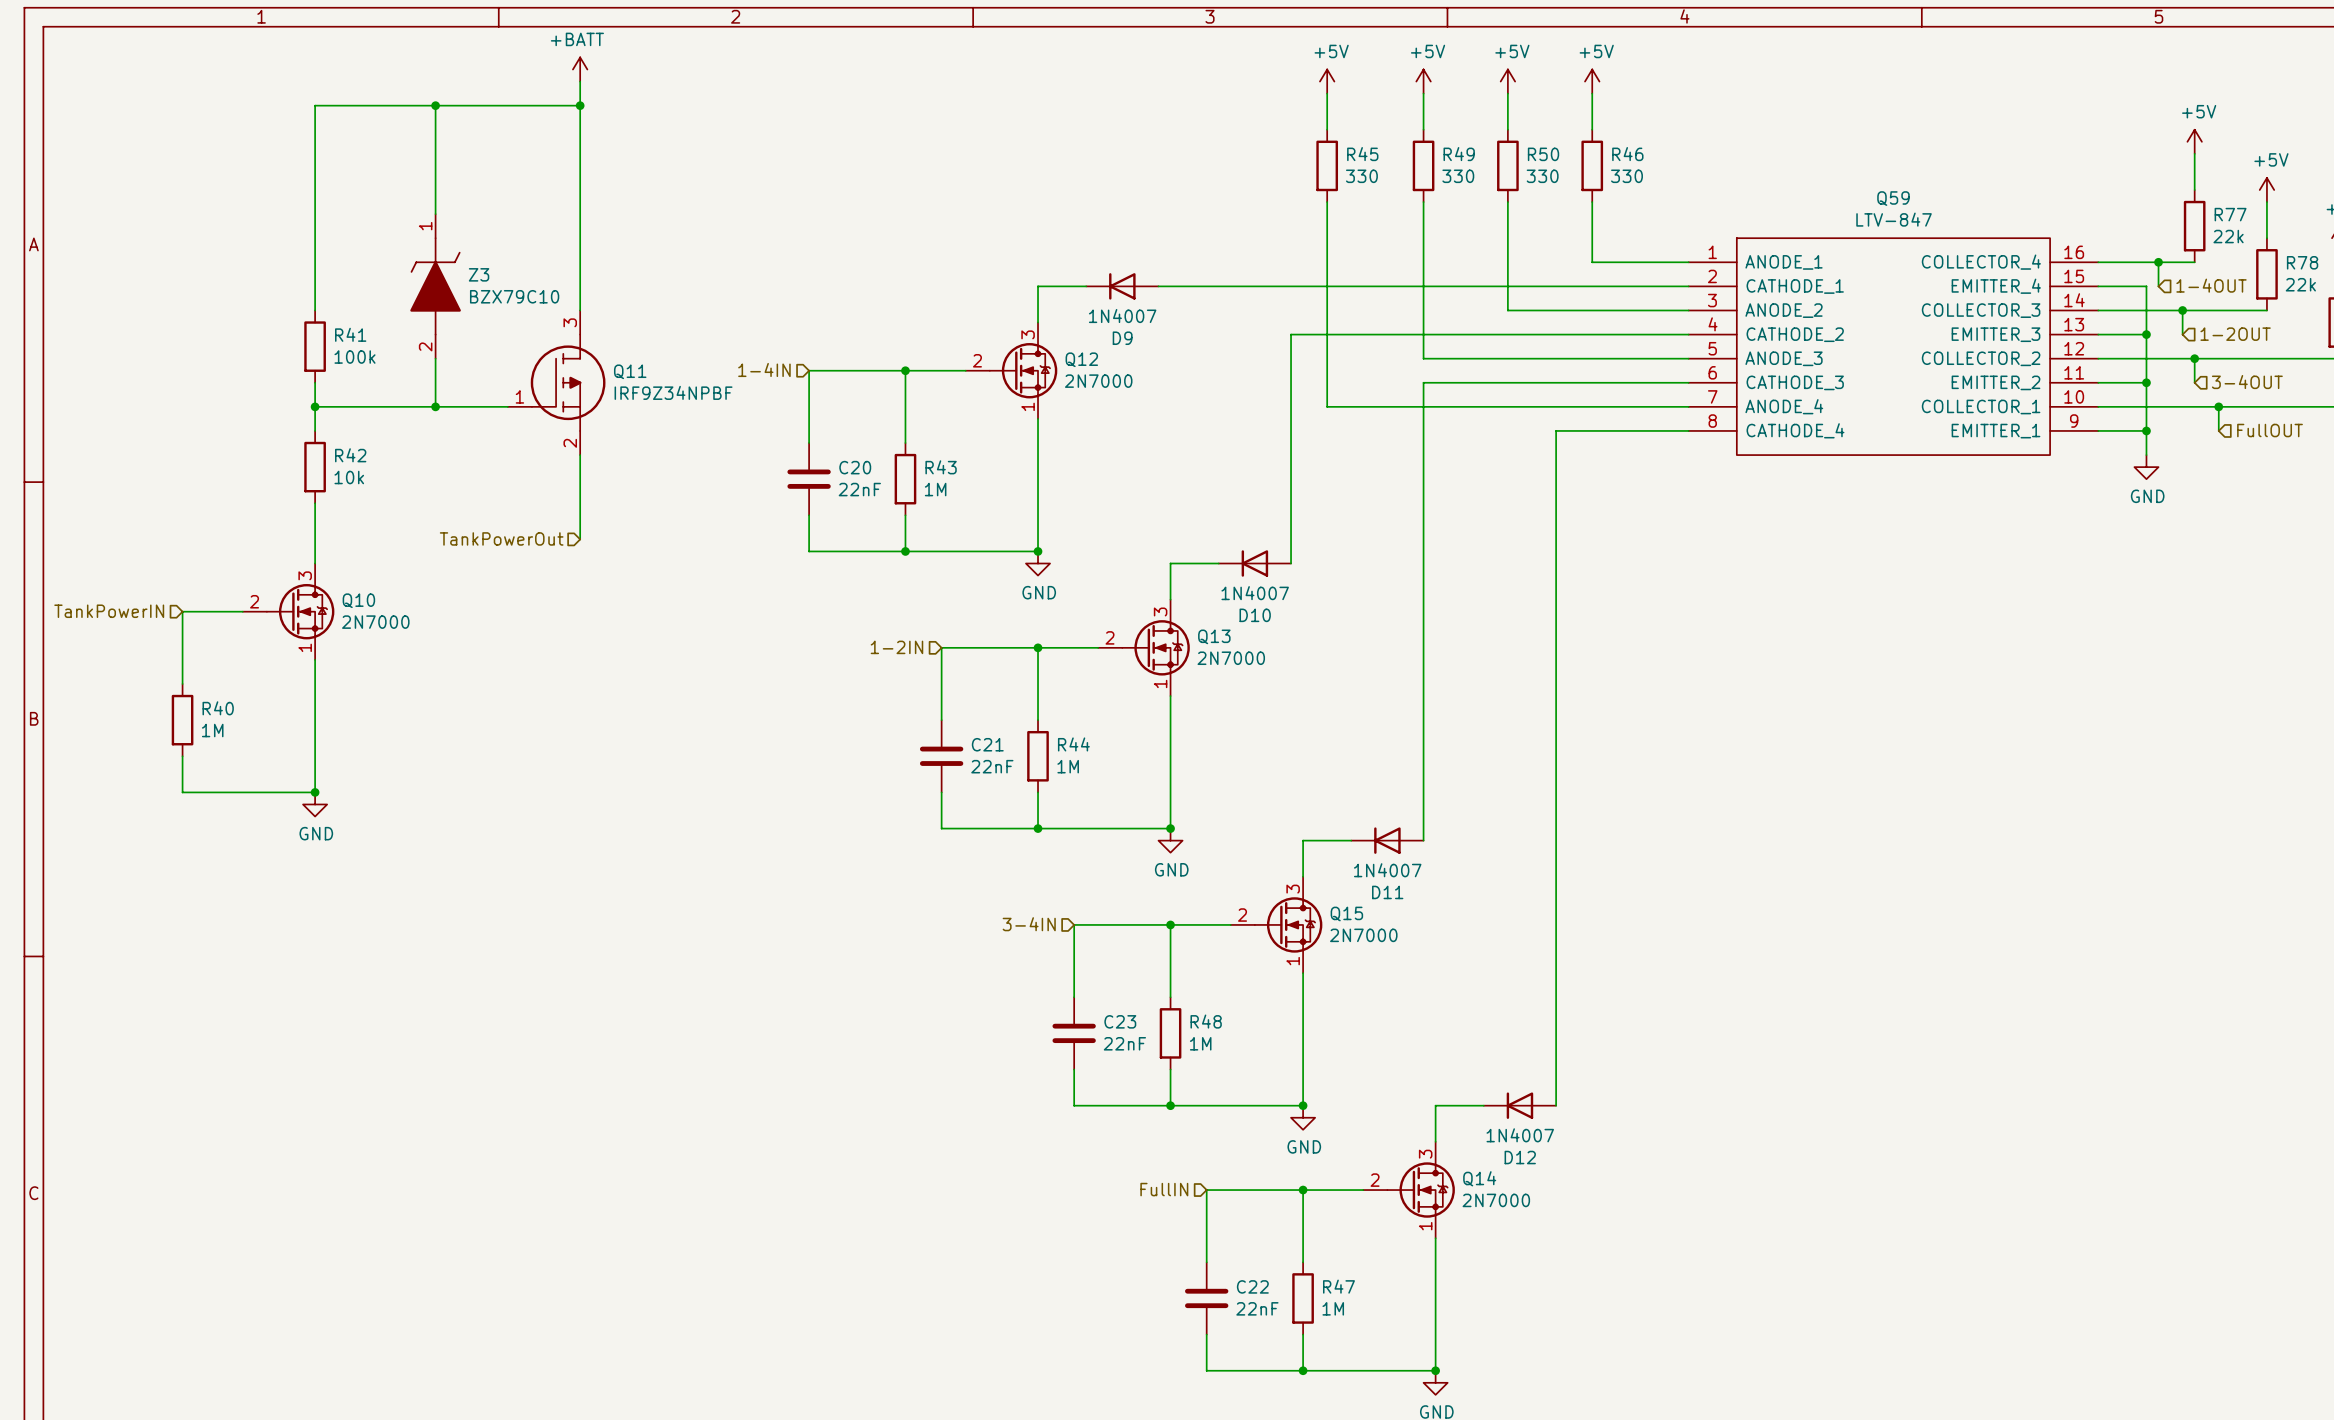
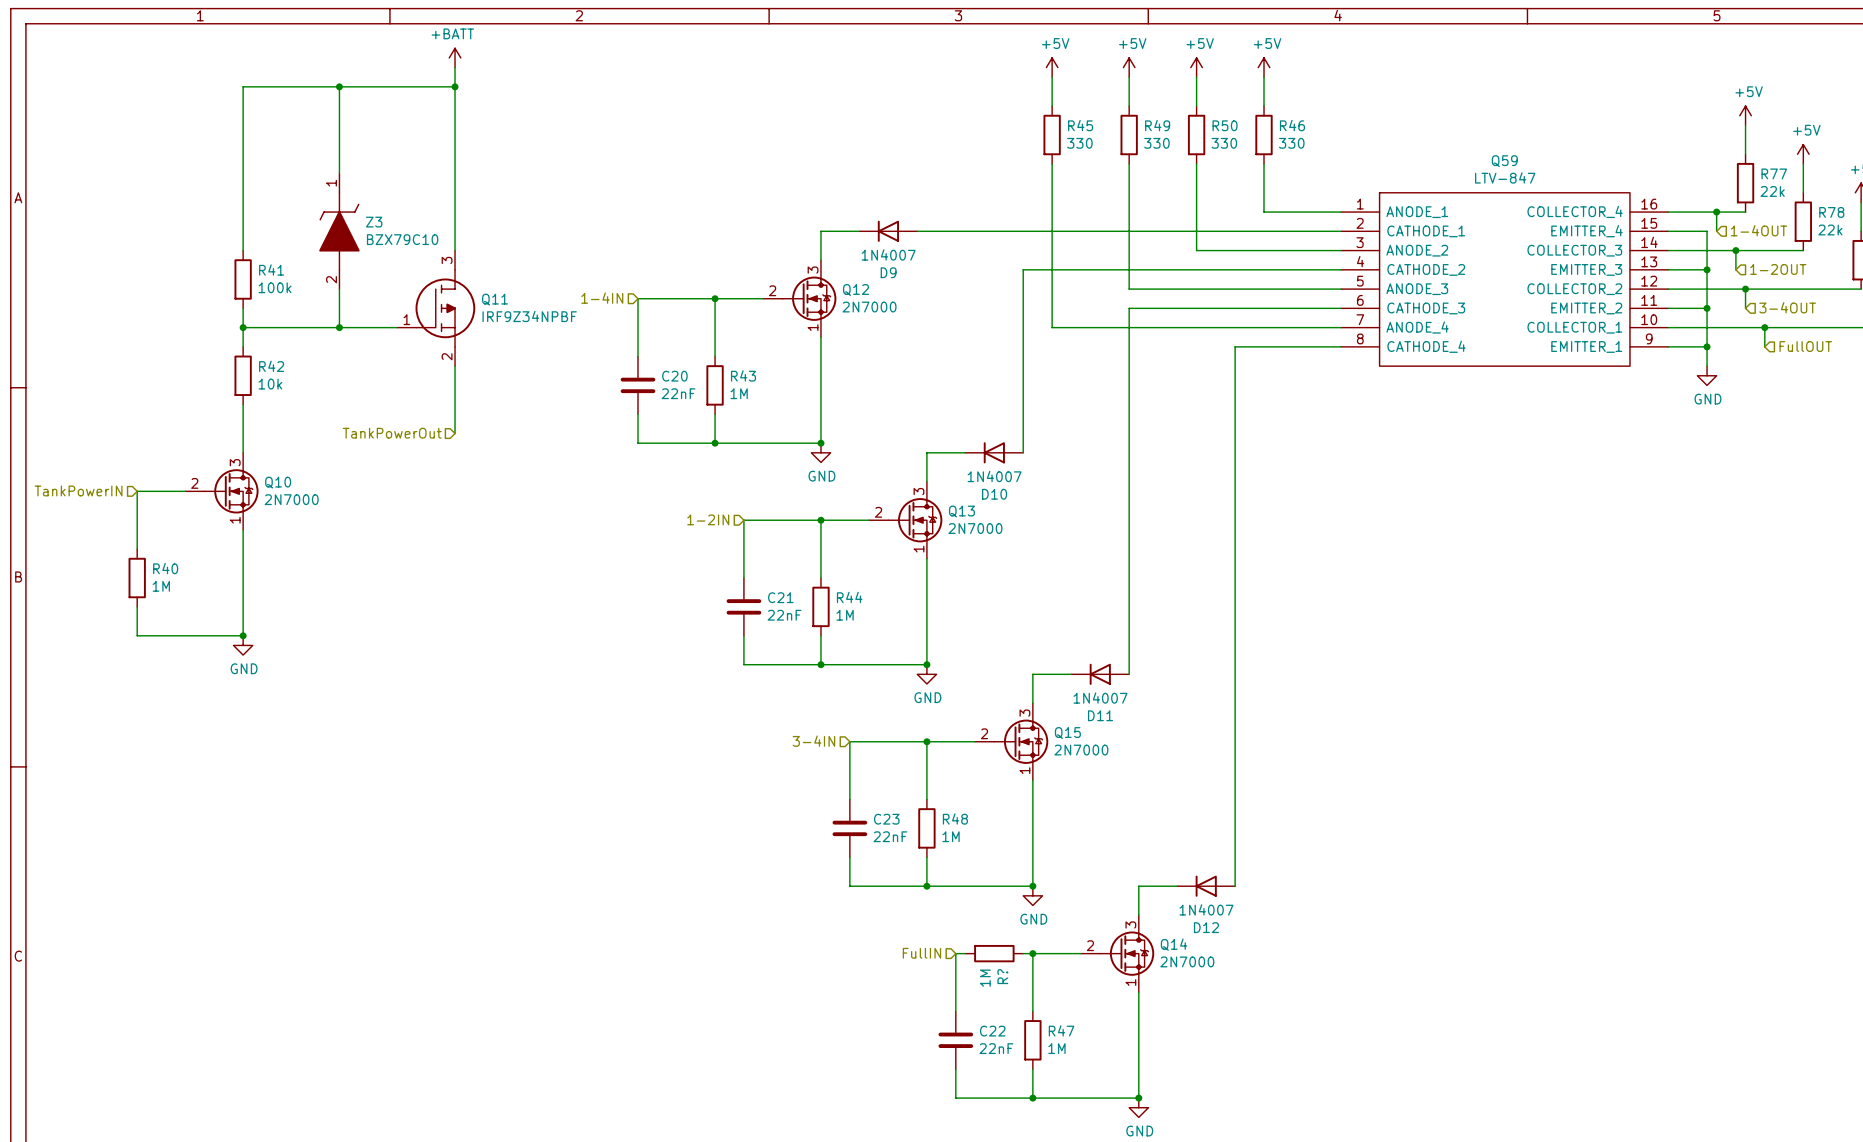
wire: (1218, 1190) (1291, 1190) -> none
R?: none -> 1M (994, 953)

